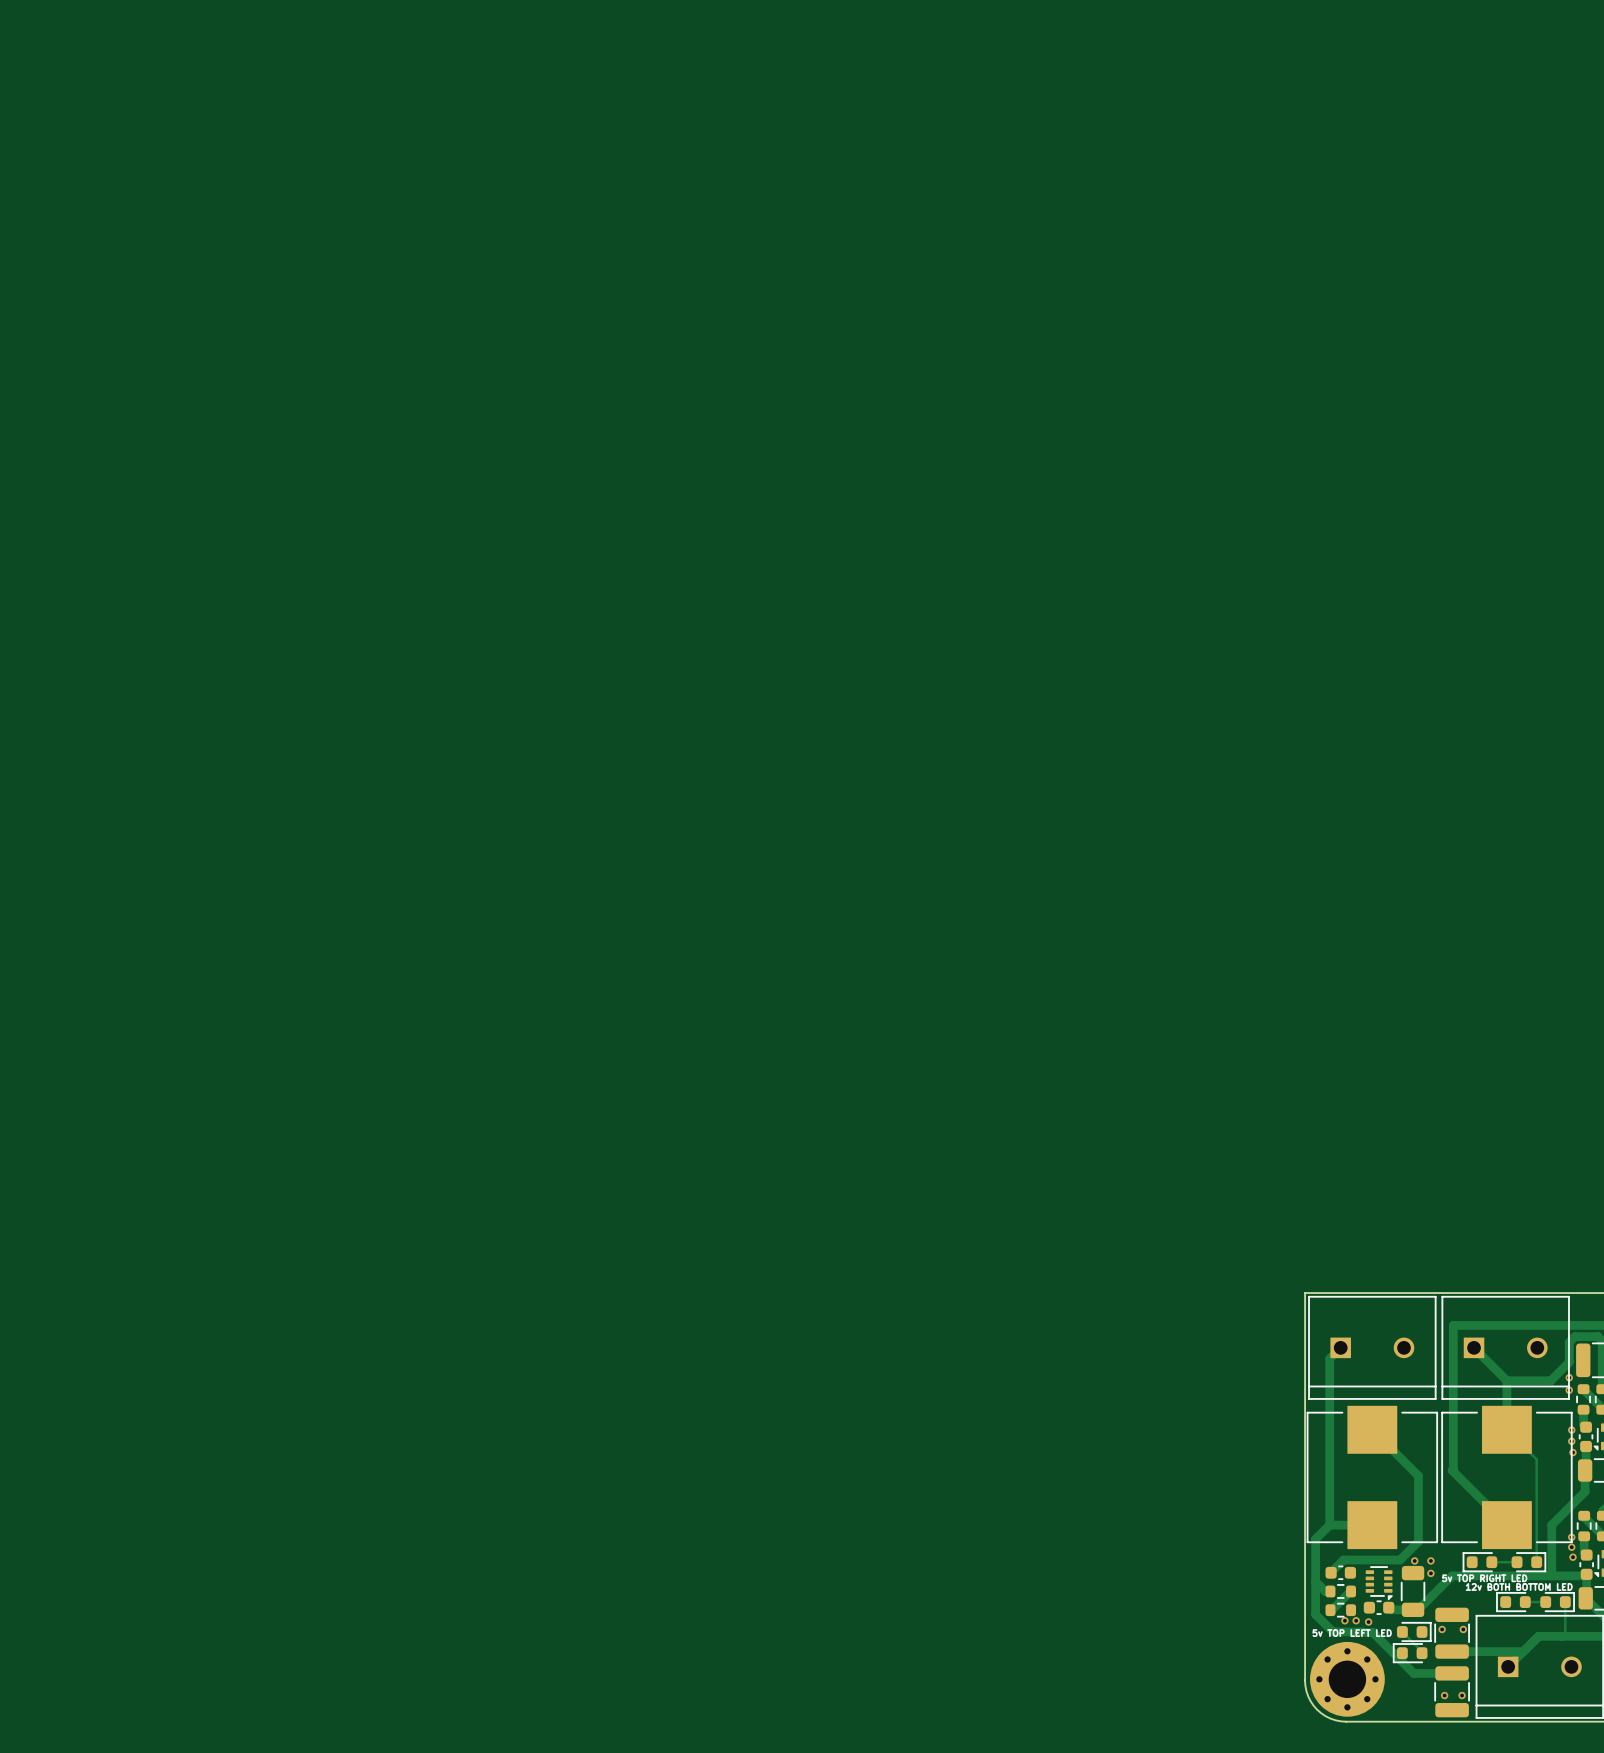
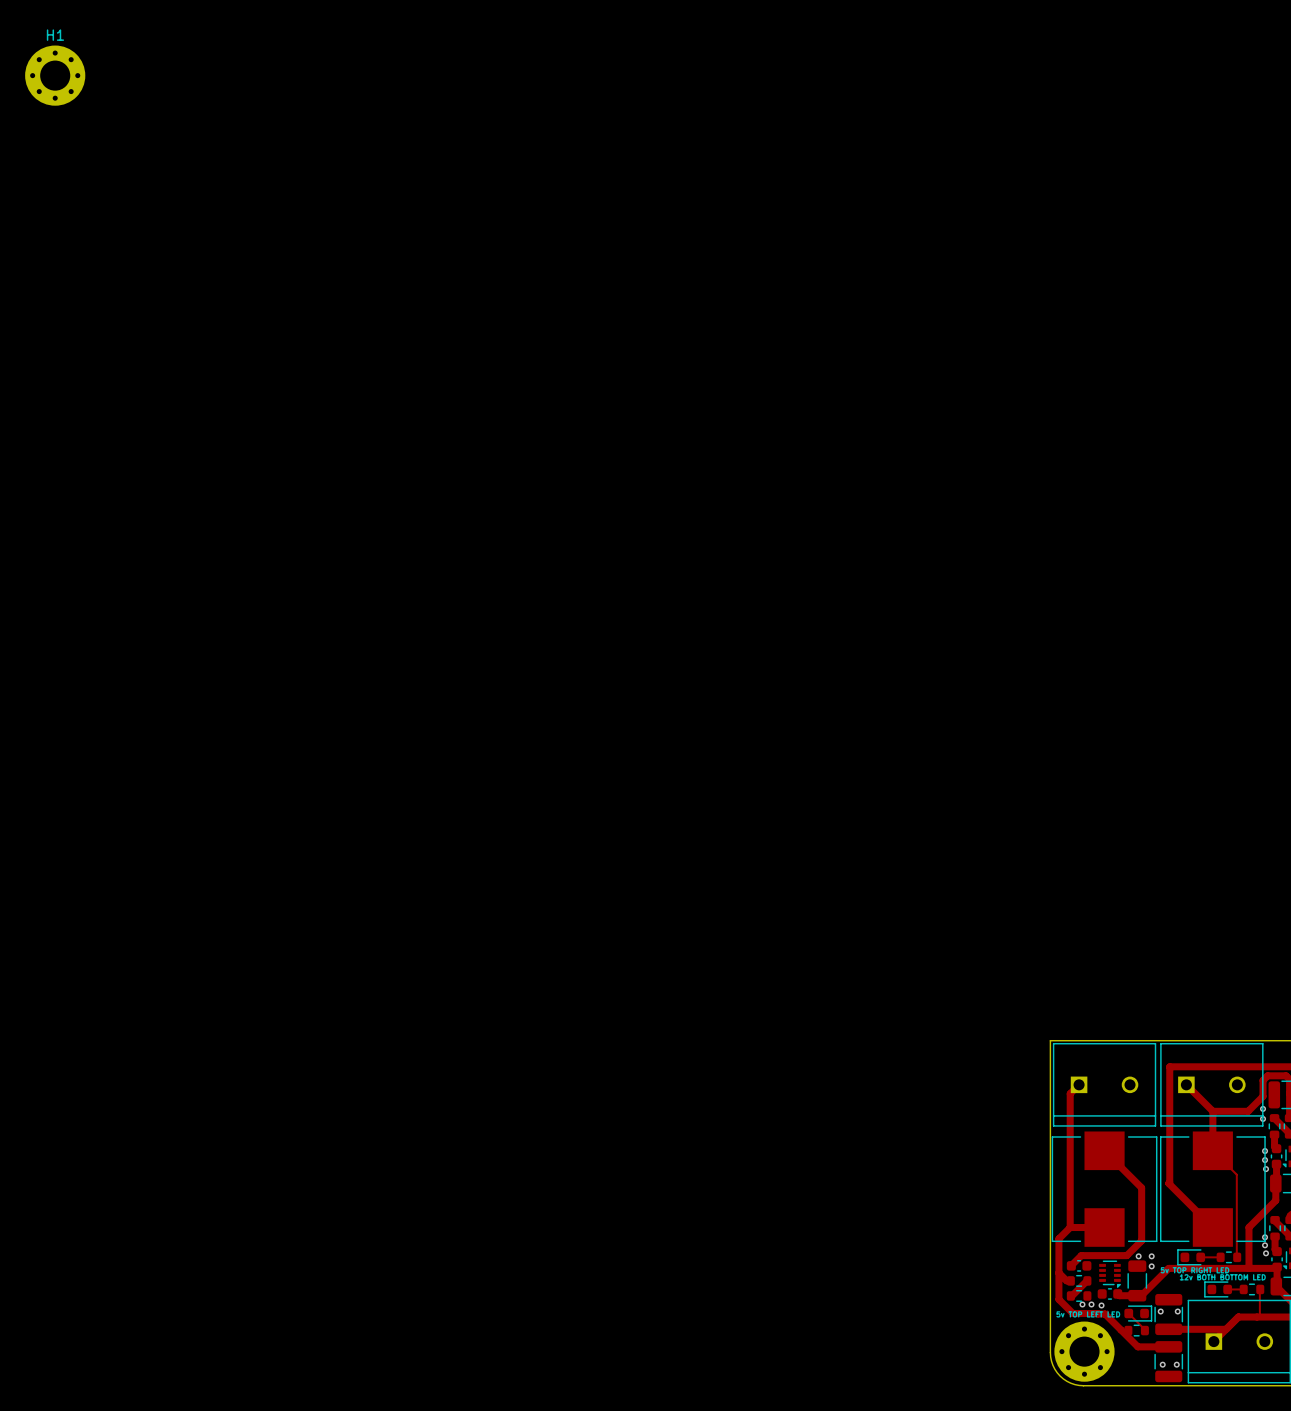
H1: none -> (55, 75)
part footprint: [1511, 1552, 1547, 1573] -> [1216, 1251, 1242, 1264]
part footprint: [1540, 1592, 1575, 1612] -> [1239, 1283, 1265, 1296]
part footprint: [1392, 1643, 1428, 1664] -> [1124, 1324, 1149, 1337]

